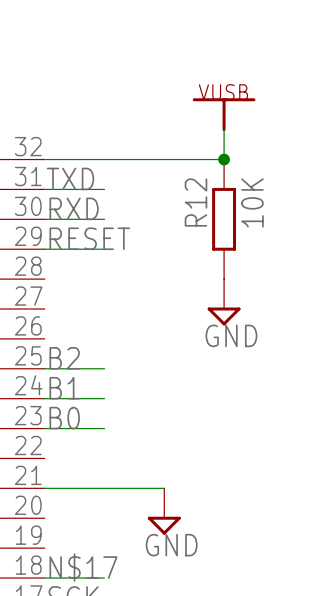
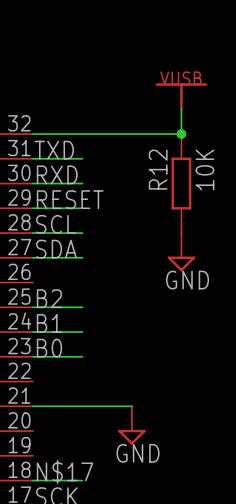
label: none -> SCL (56, 224)
wire: none -> (32, 233) (82, 233)
label: none -> SDA (56, 249)
wire: none -> (32, 257) (82, 257)

